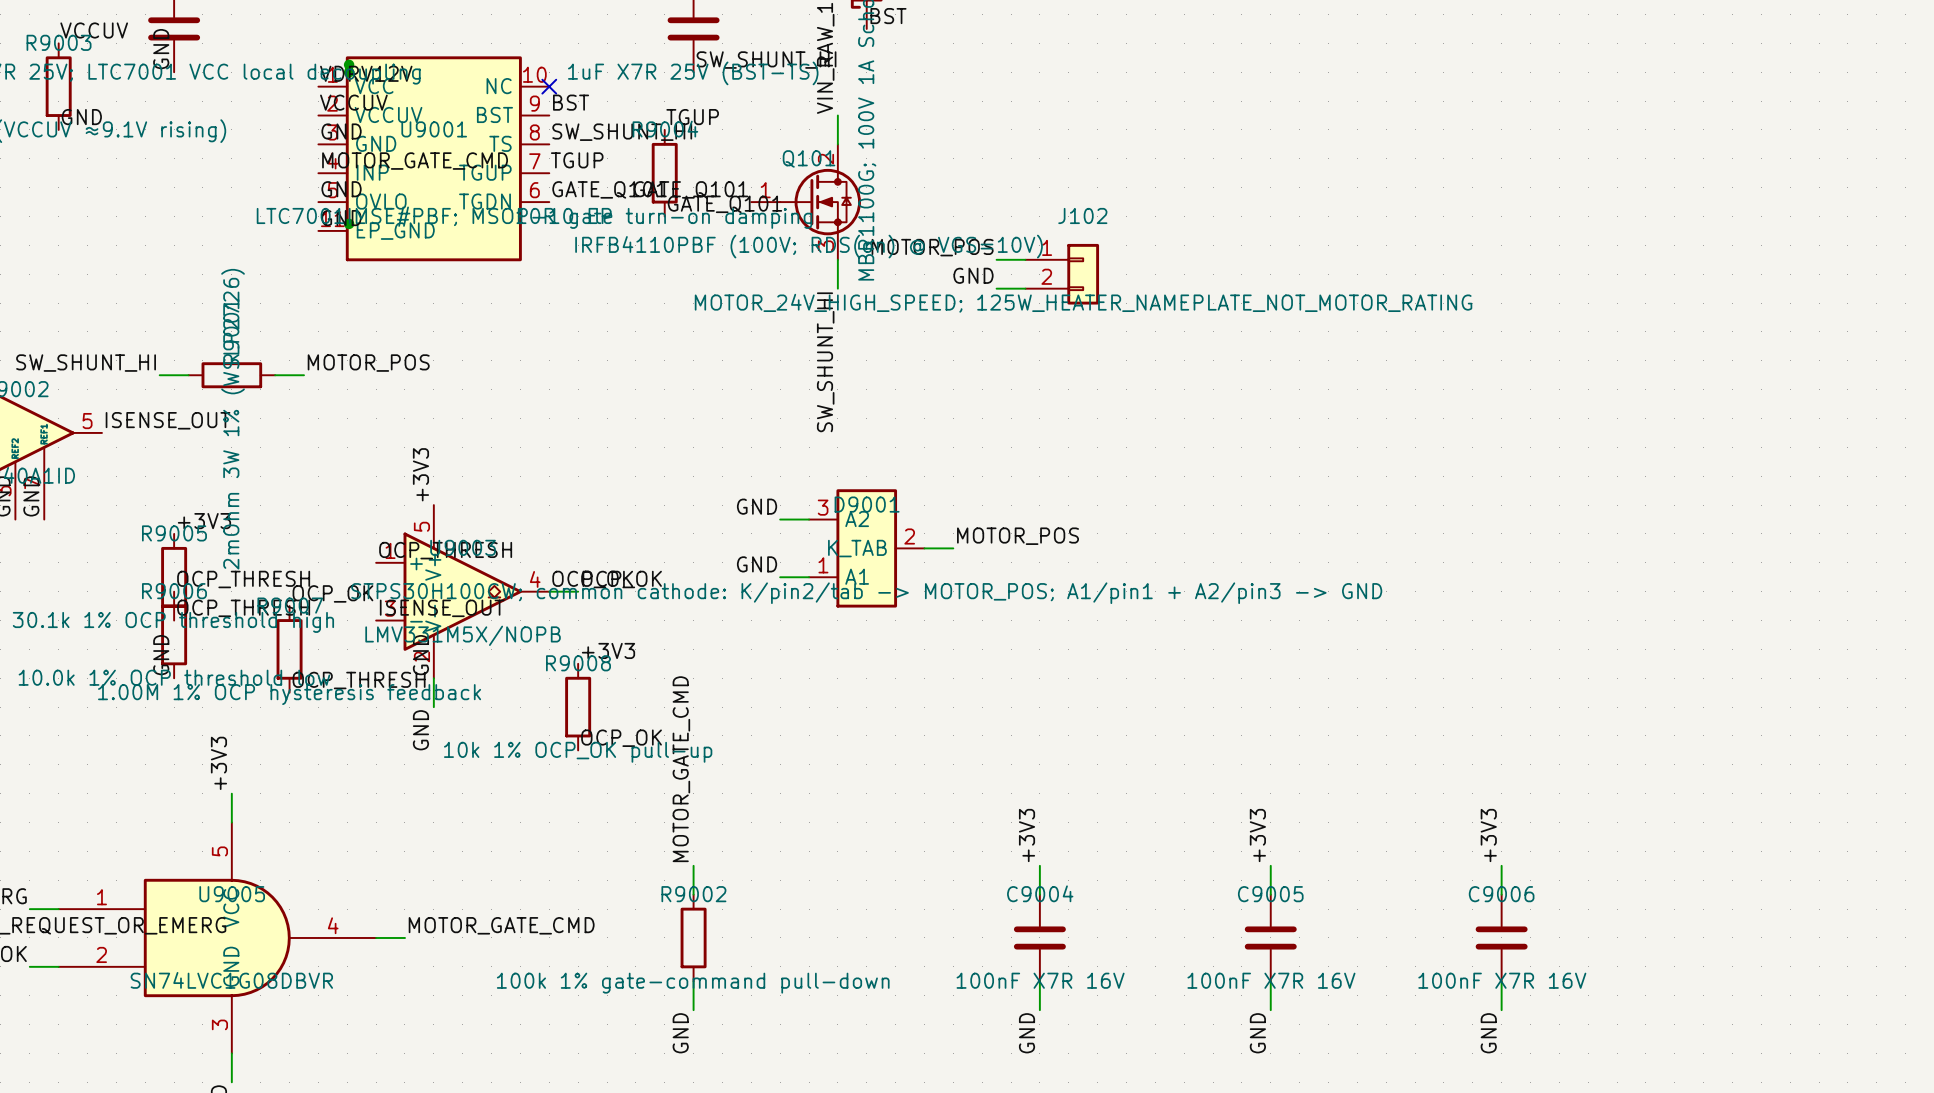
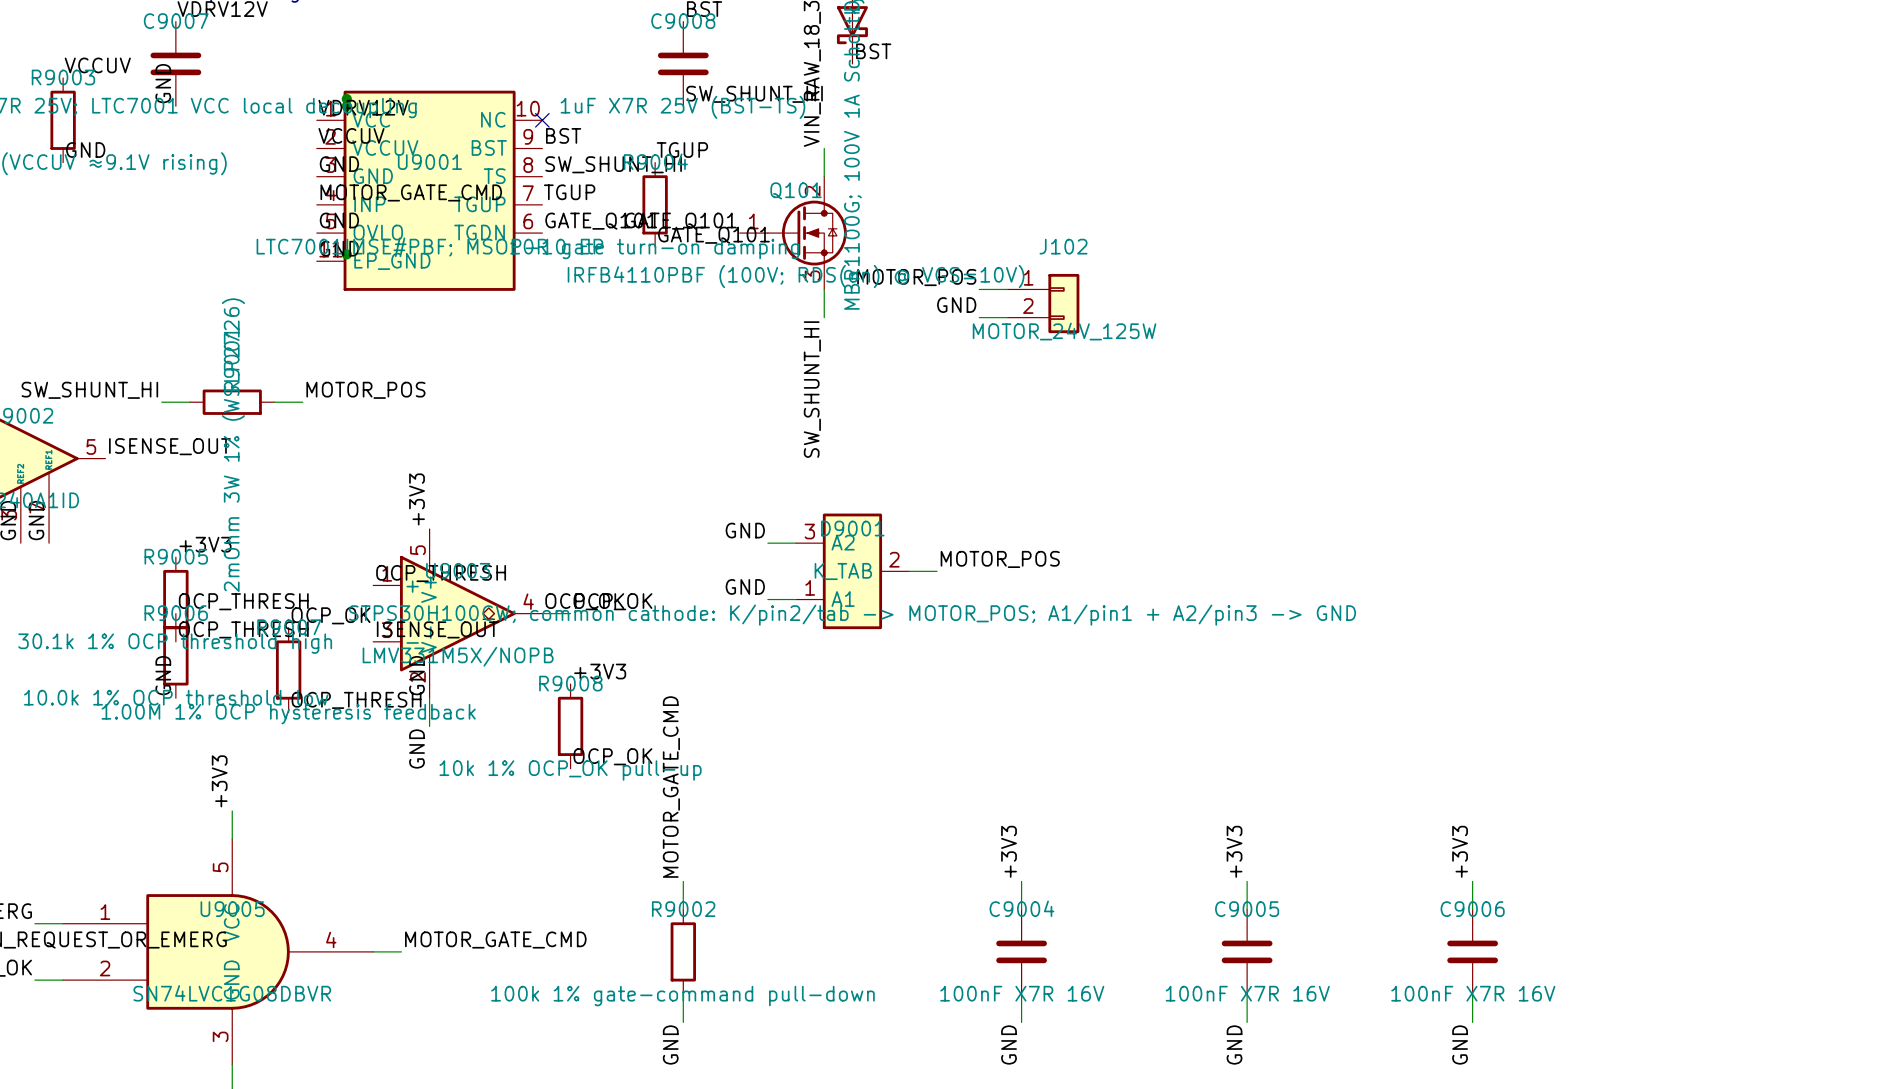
J102 value: MOTOR_24V_HIGH_SPEED; 125W_HEATER_NAMEPLATE_NOT_MOTOR_RATING (1083, 303) -> MOTOR_24V_125W (1064, 331)

